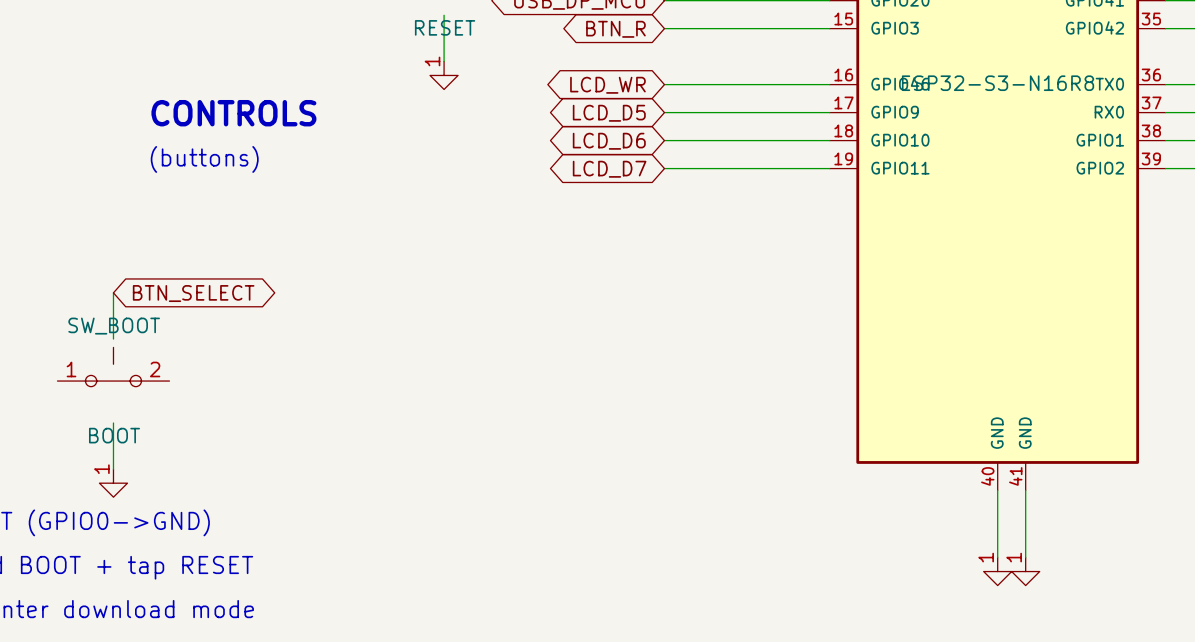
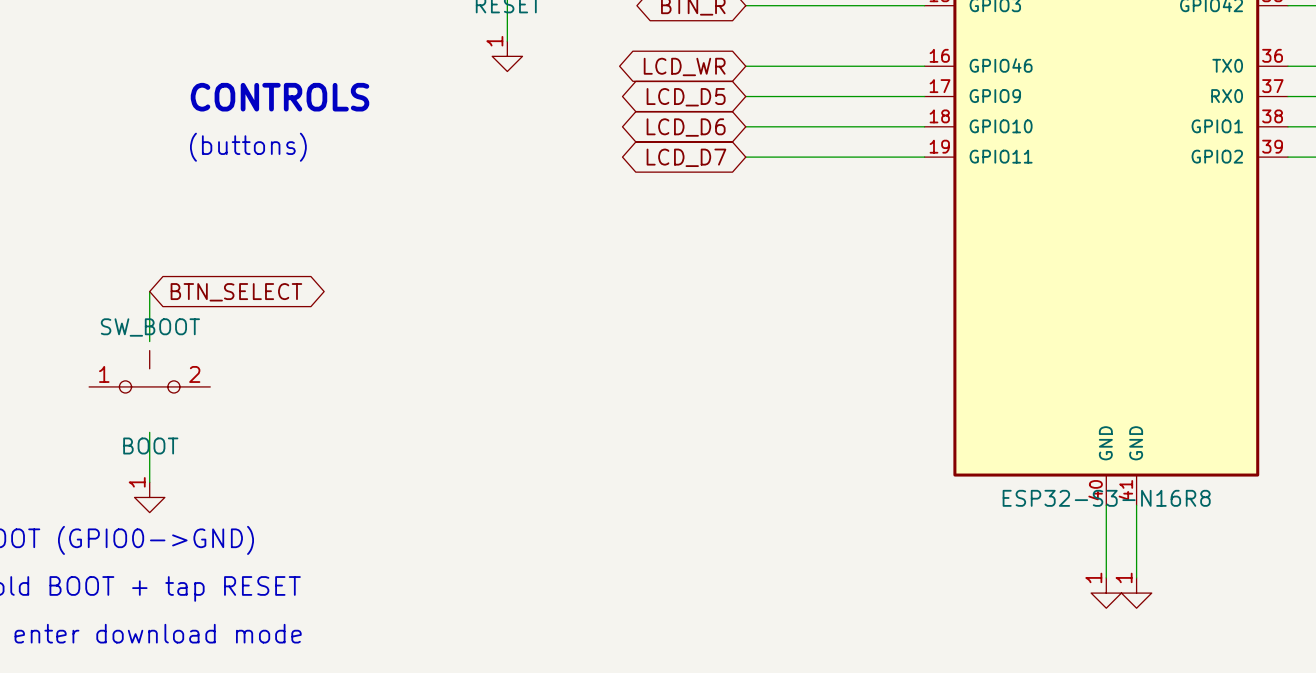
part value position: ESP32-S3-N16R8 (998, 83) -> ESP32-S3-N16R8 (1106, 498)

